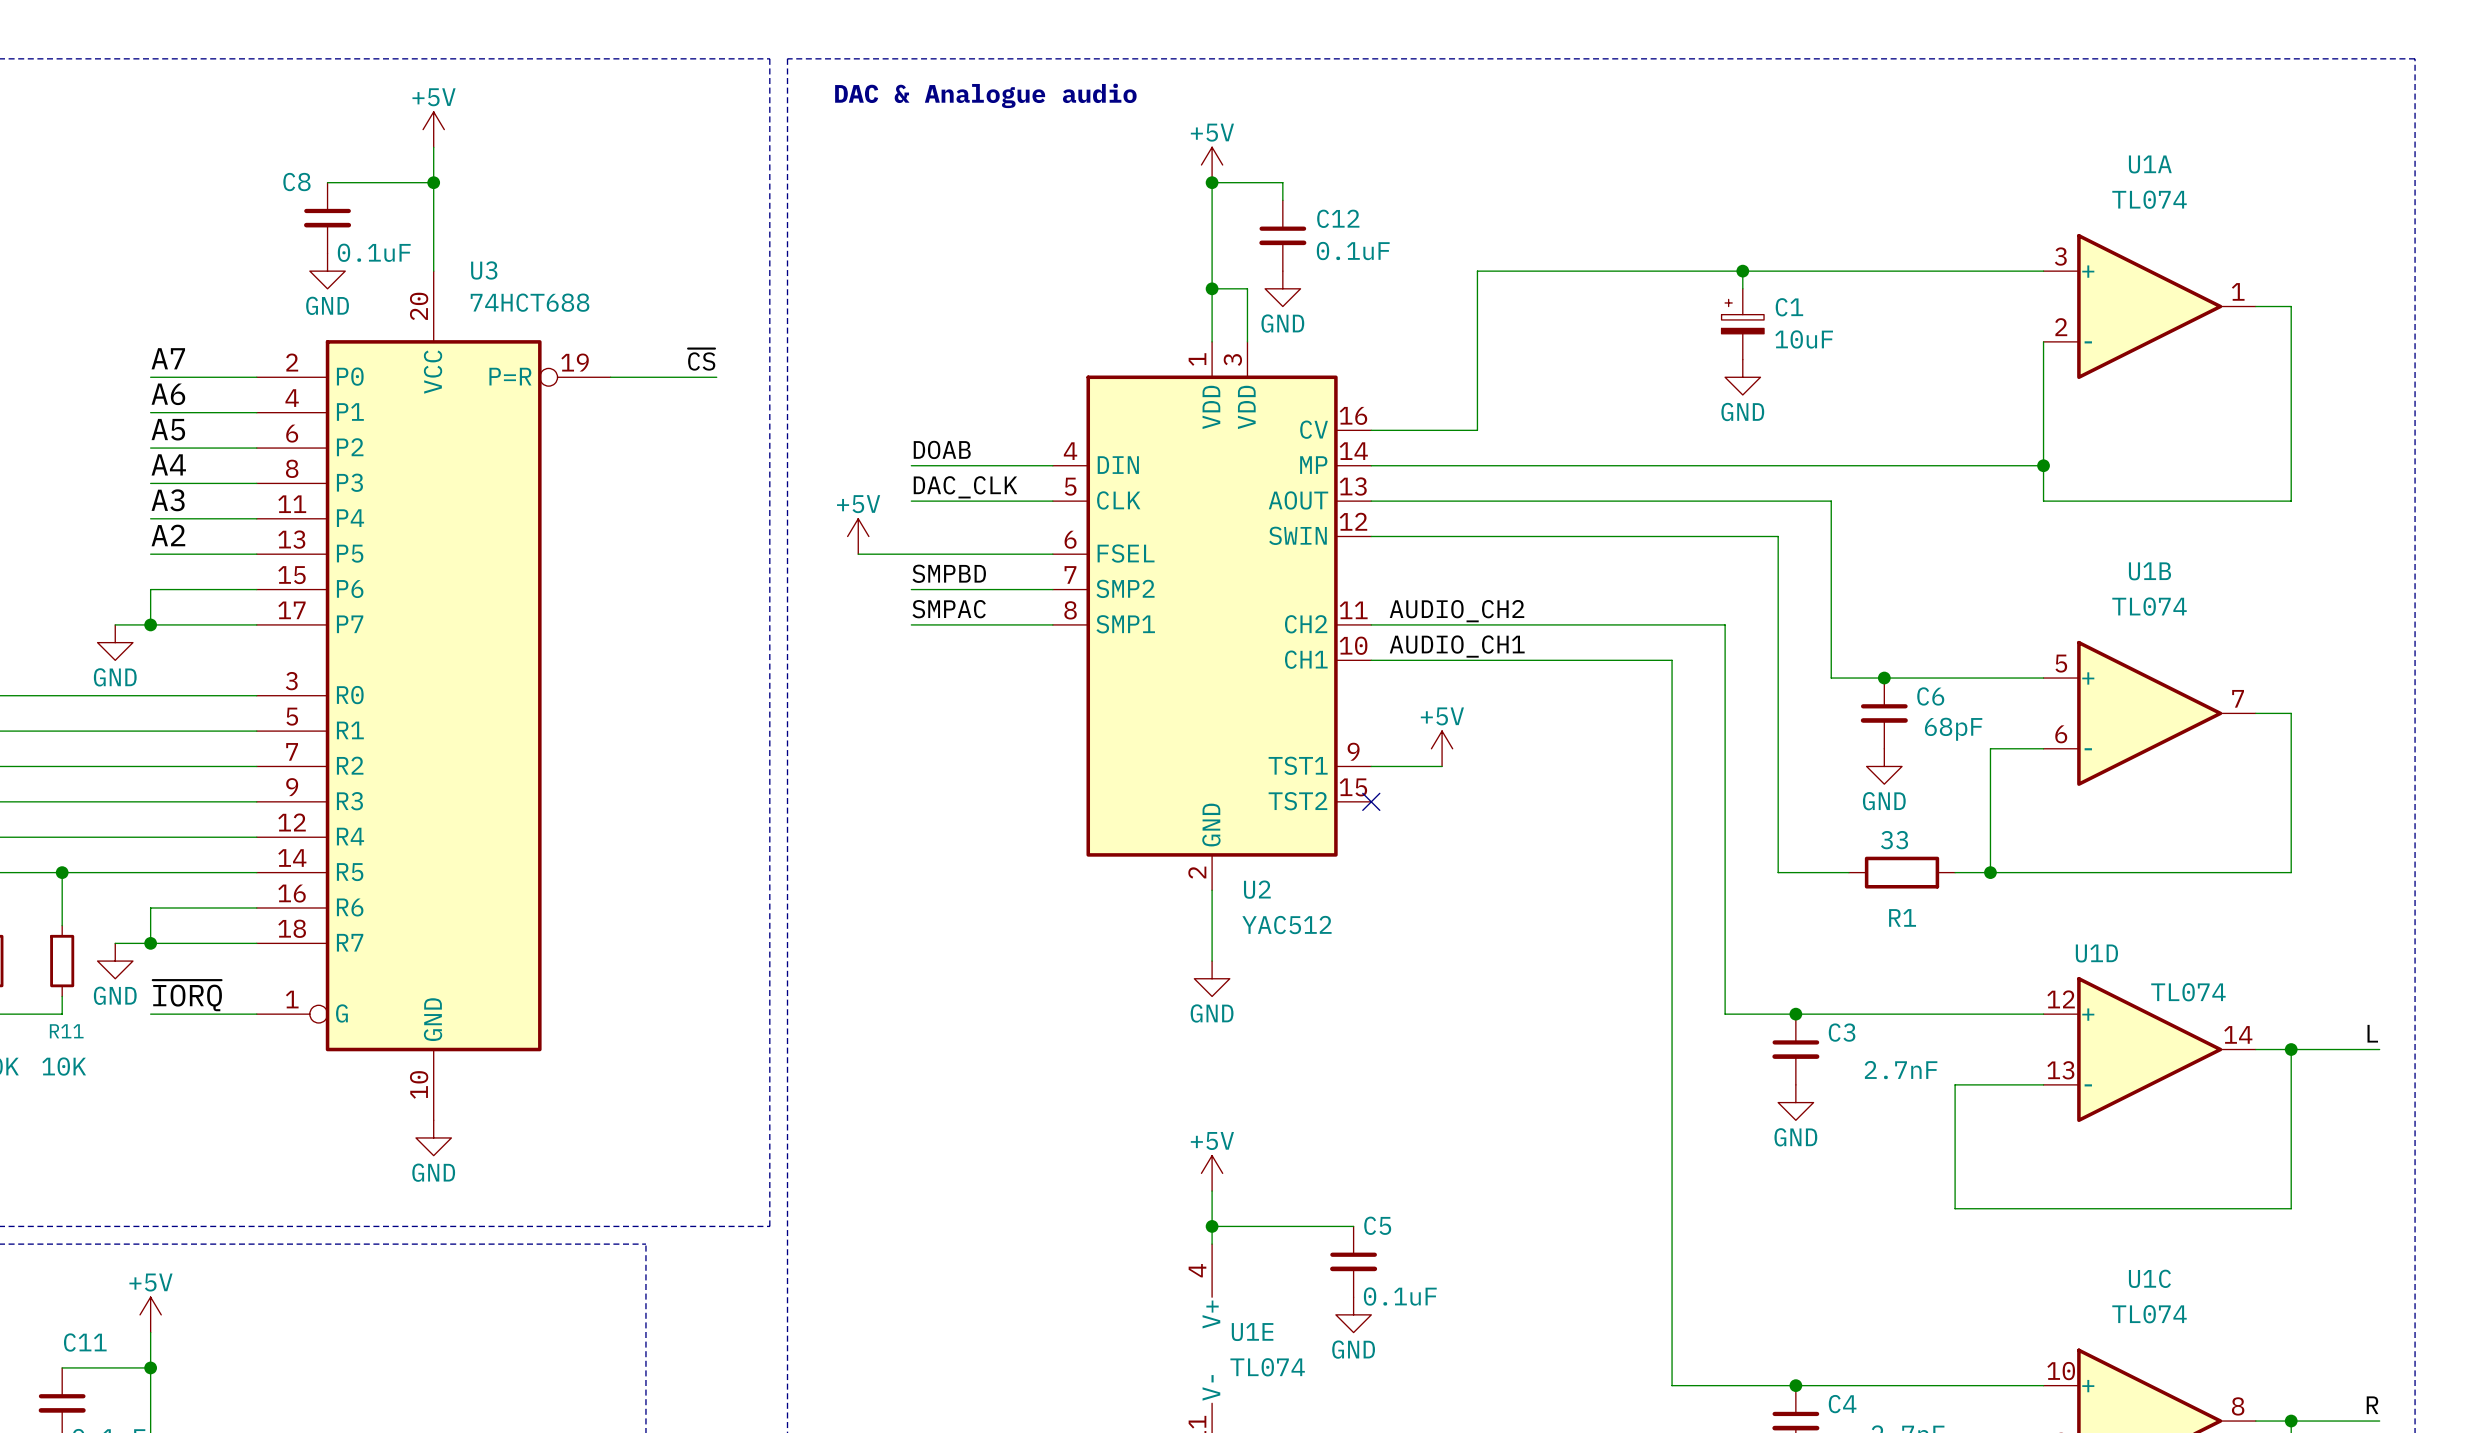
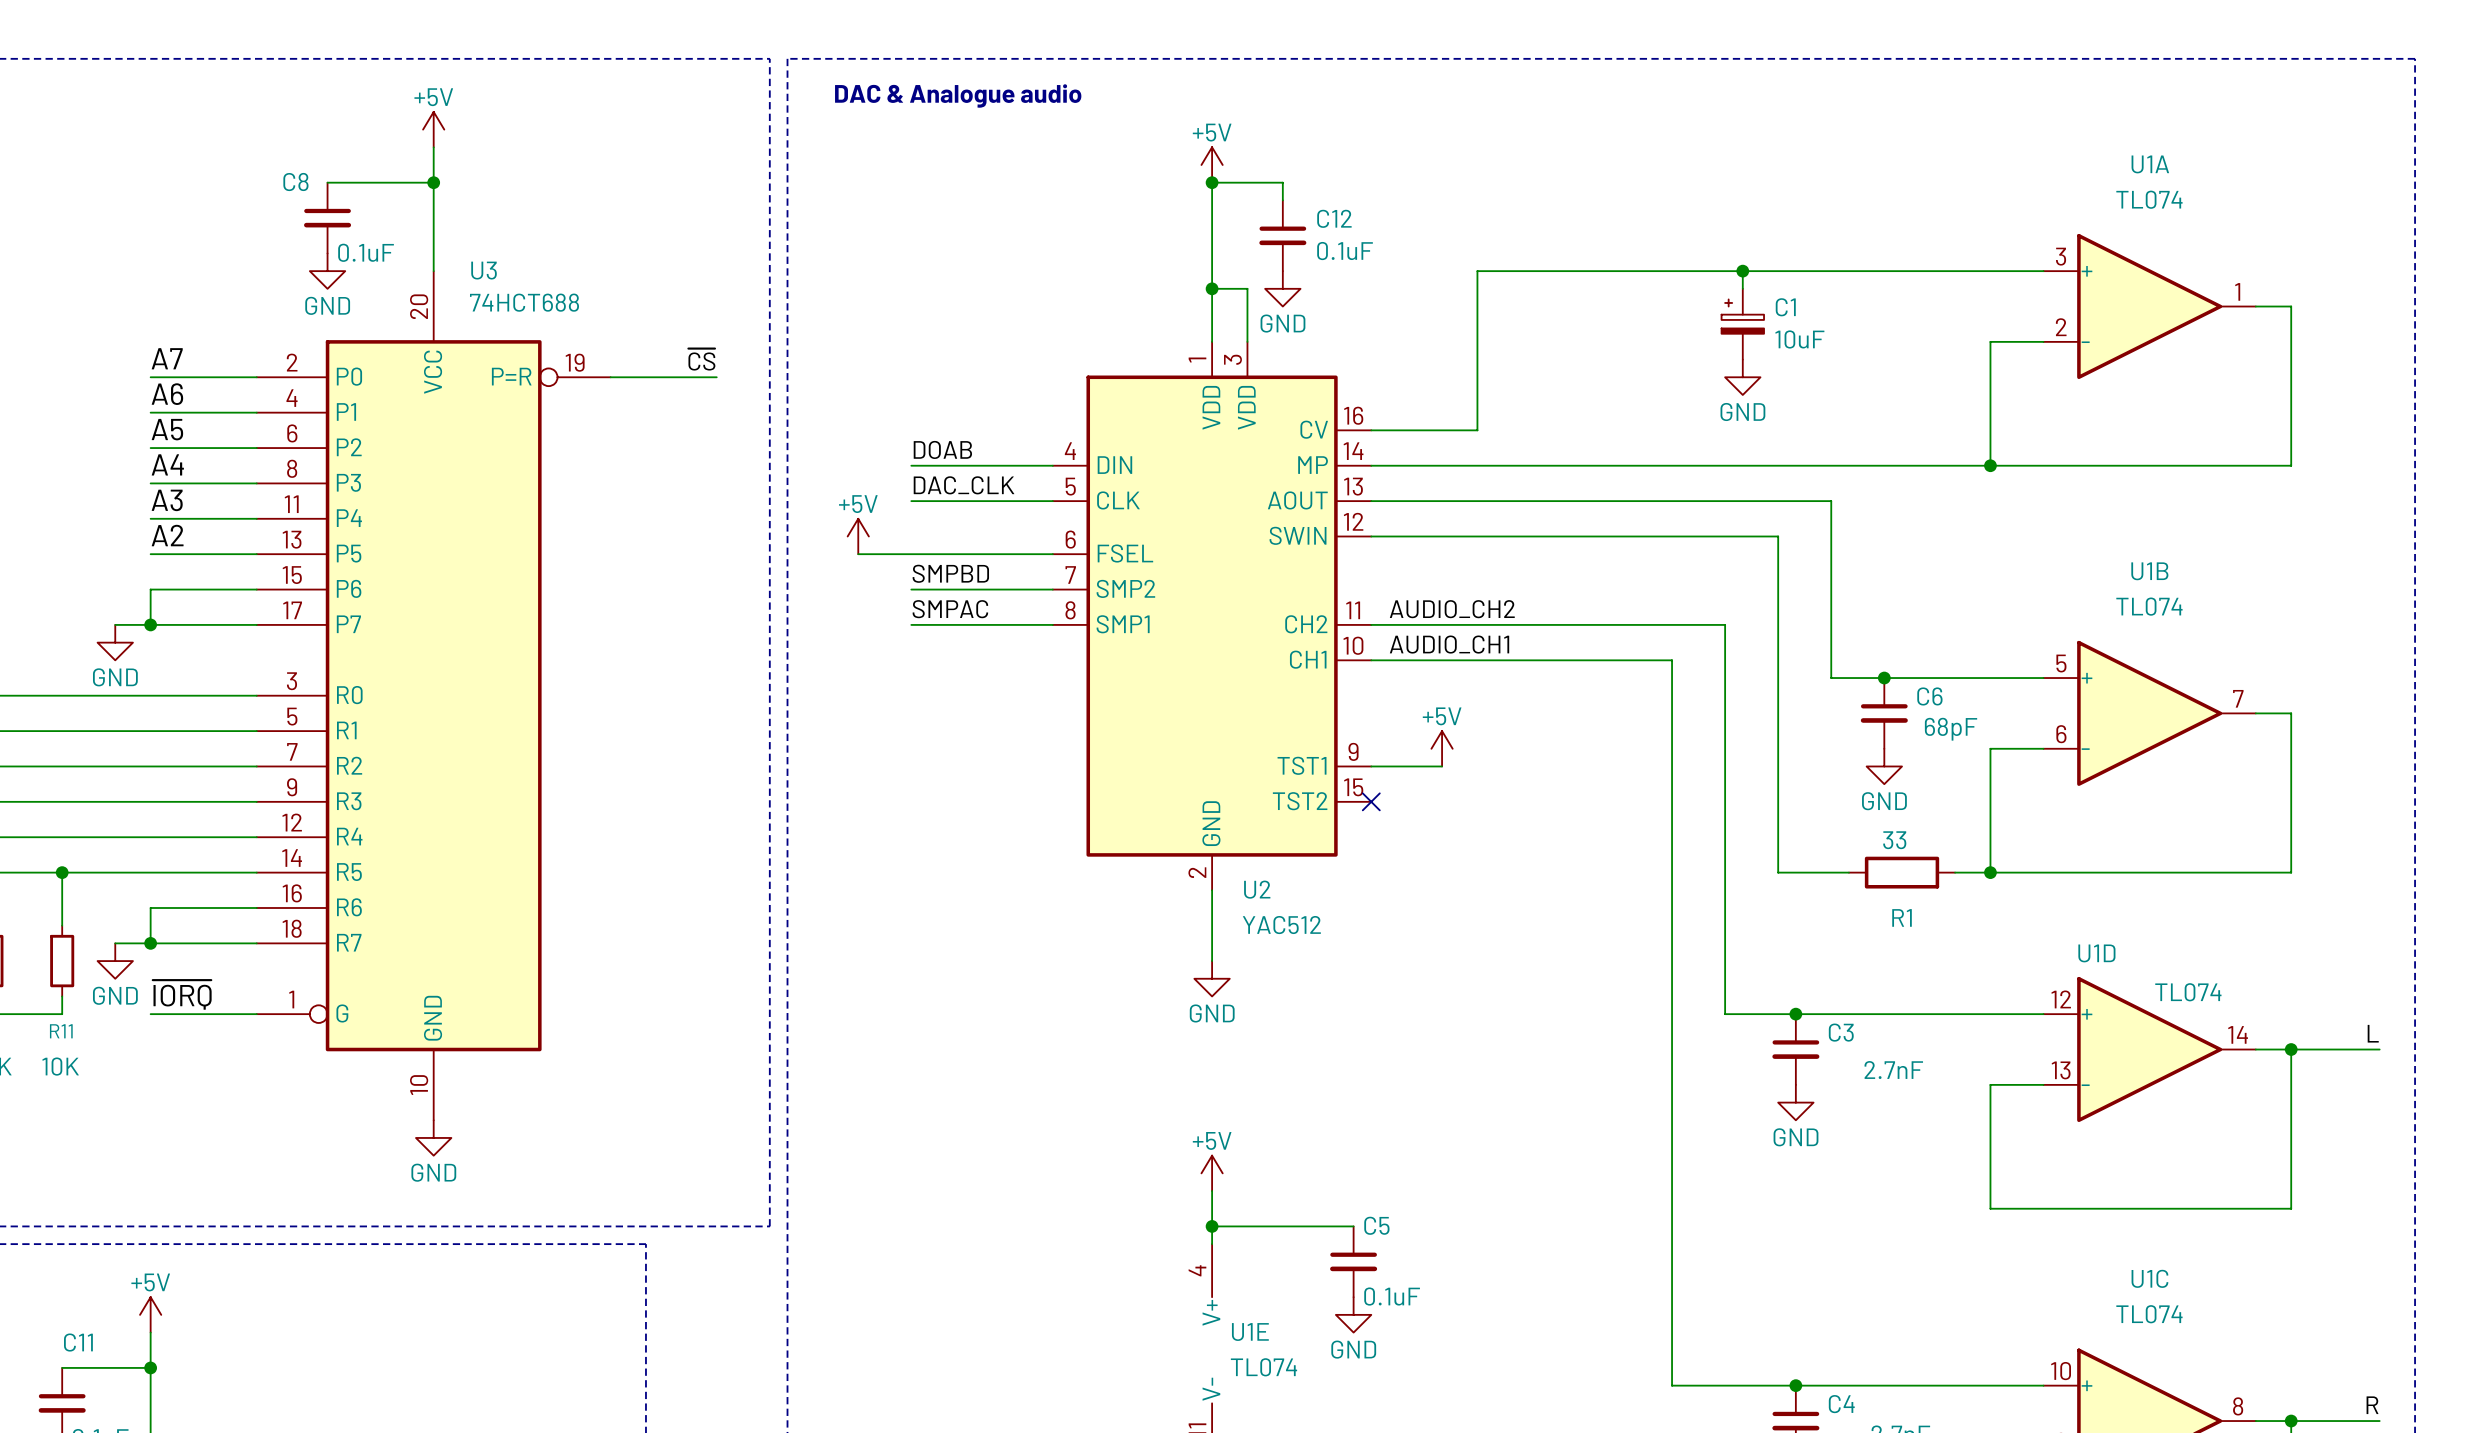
wire: (2043, 341) (2043, 501) (2291, 501) (2291, 465) -> (2043, 465) (2291, 465)
wire: none -> (2043, 341) (1990, 341) (1990, 465)
junction position: (2043, 465) -> (1990, 465)
wire: (1990, 1084) (1955, 1084) (1955, 1208) (1990, 1208) -> (1990, 1084) (1990, 1208)

